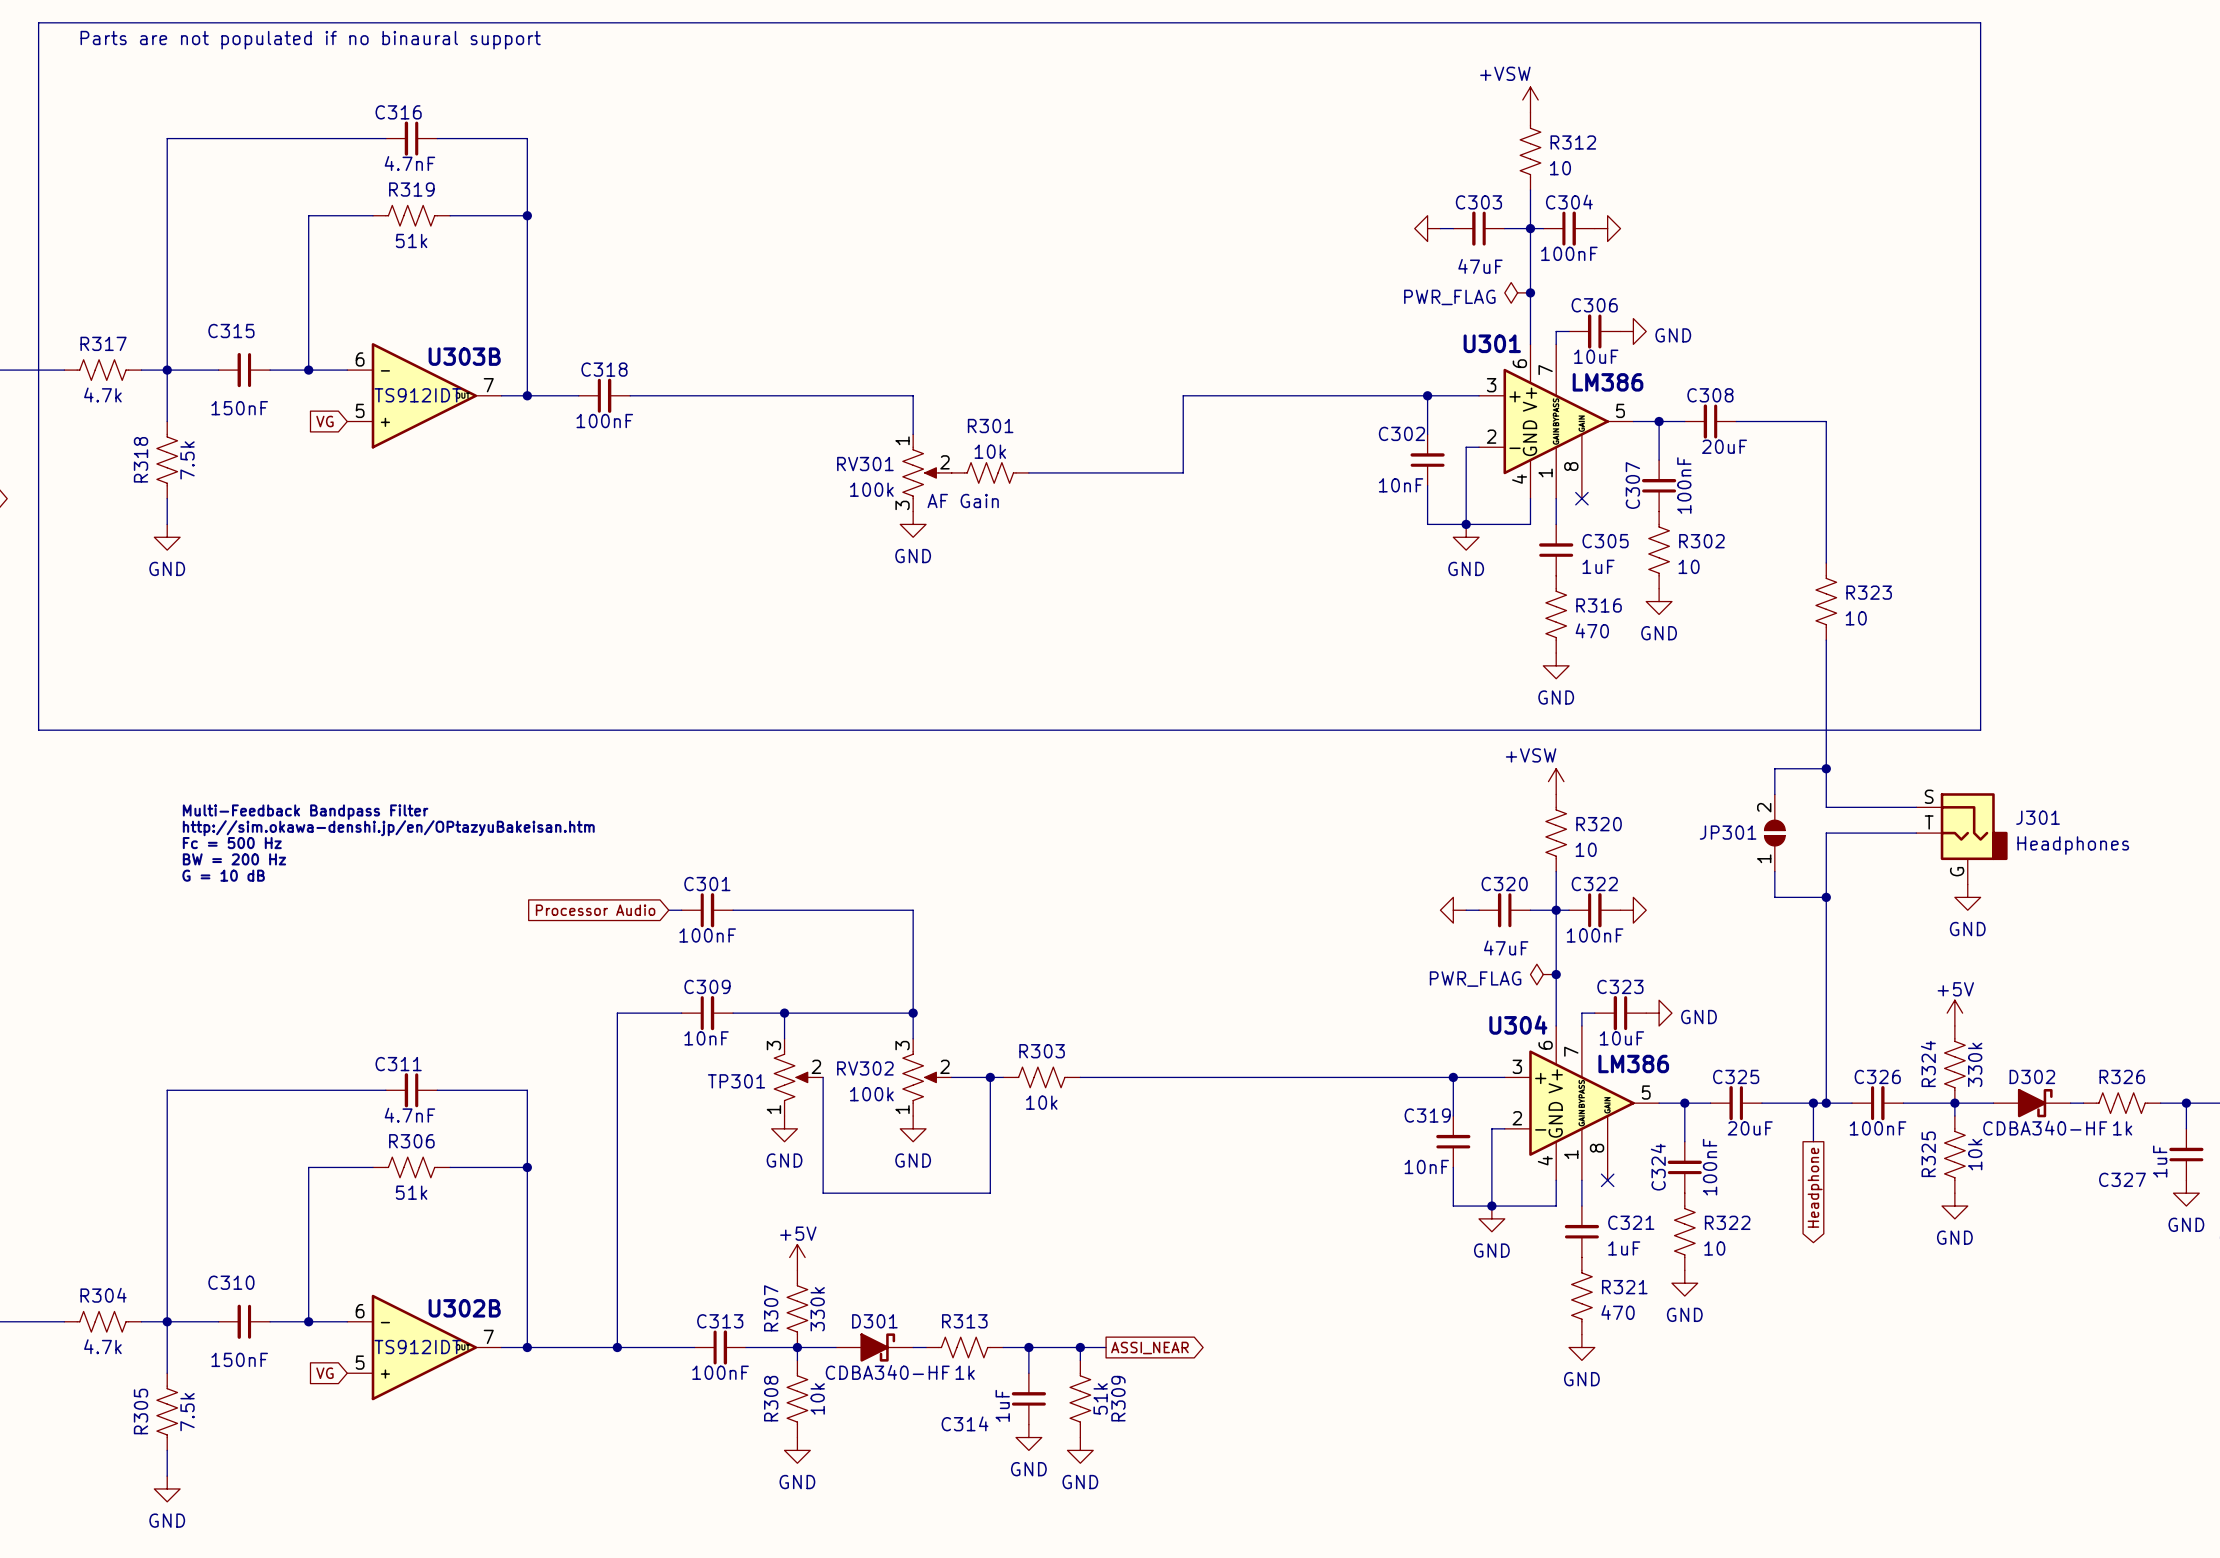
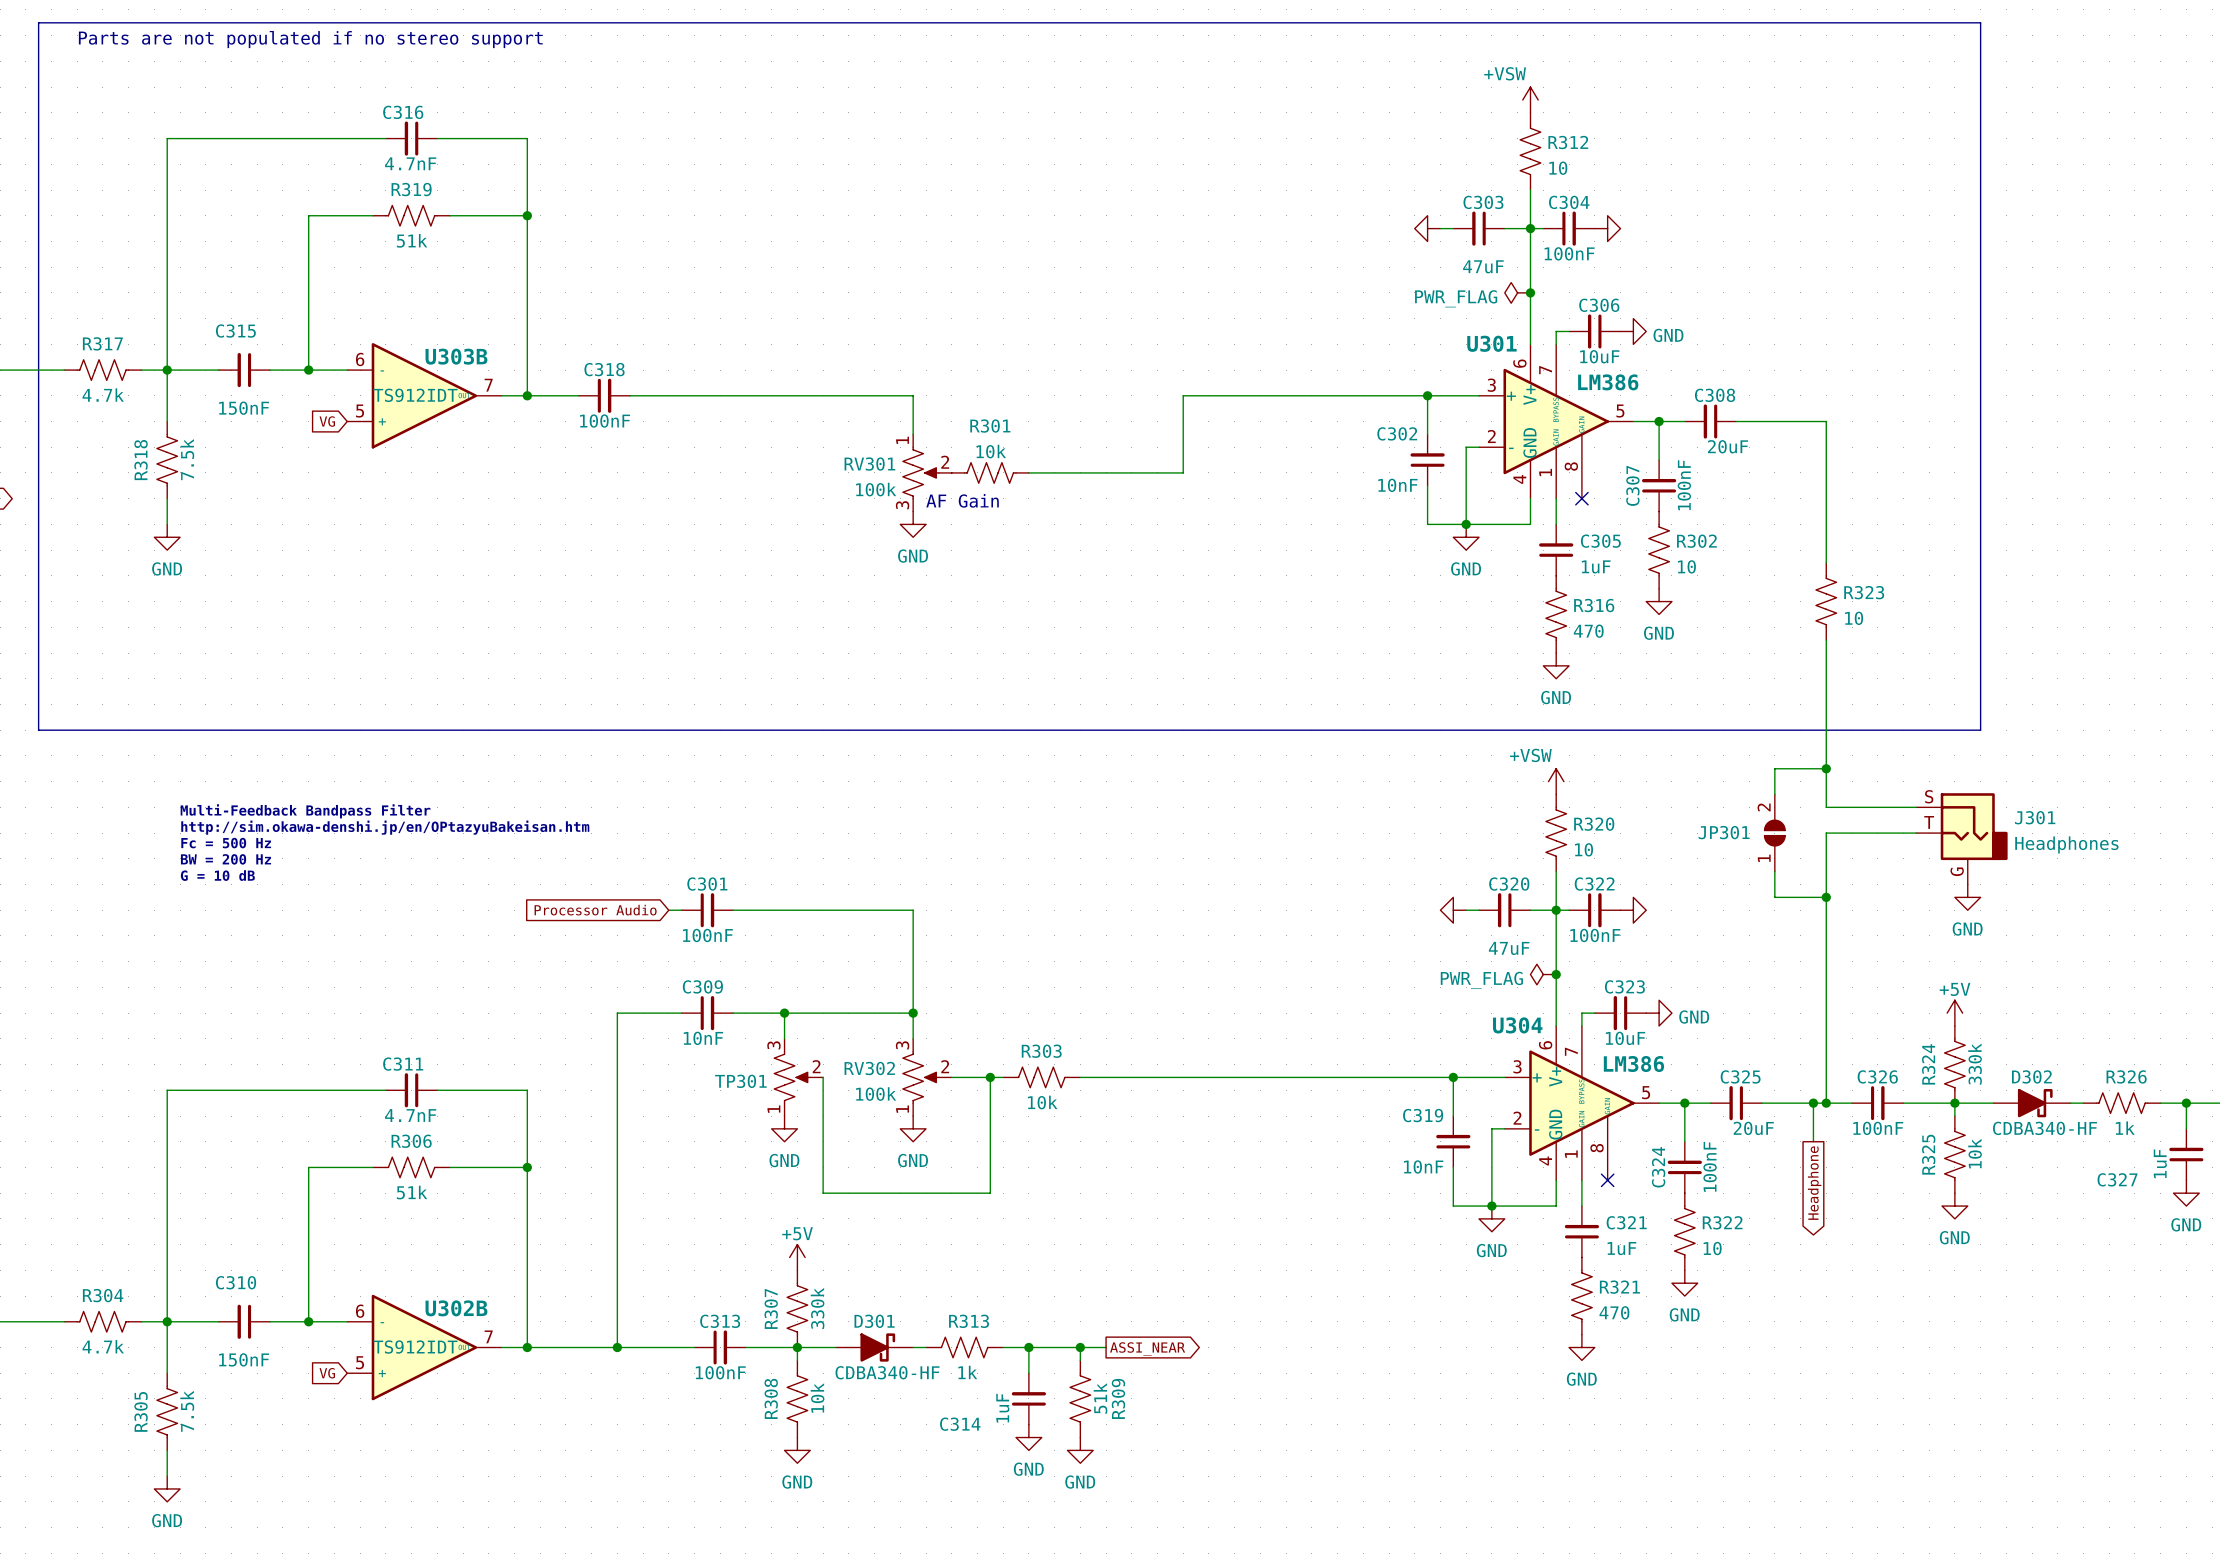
text: Parts are not populated if no binaural support (310, 40) -> Parts are not populated if no stereo support (310, 39)

